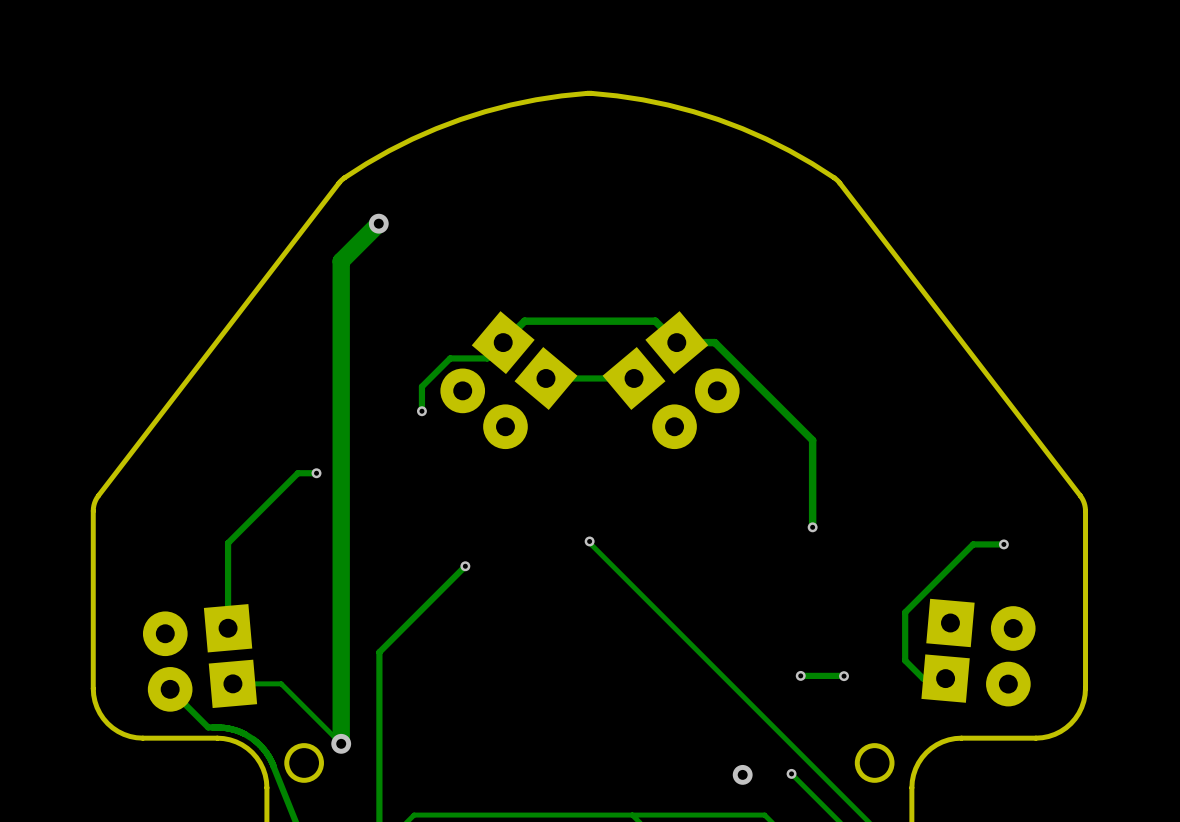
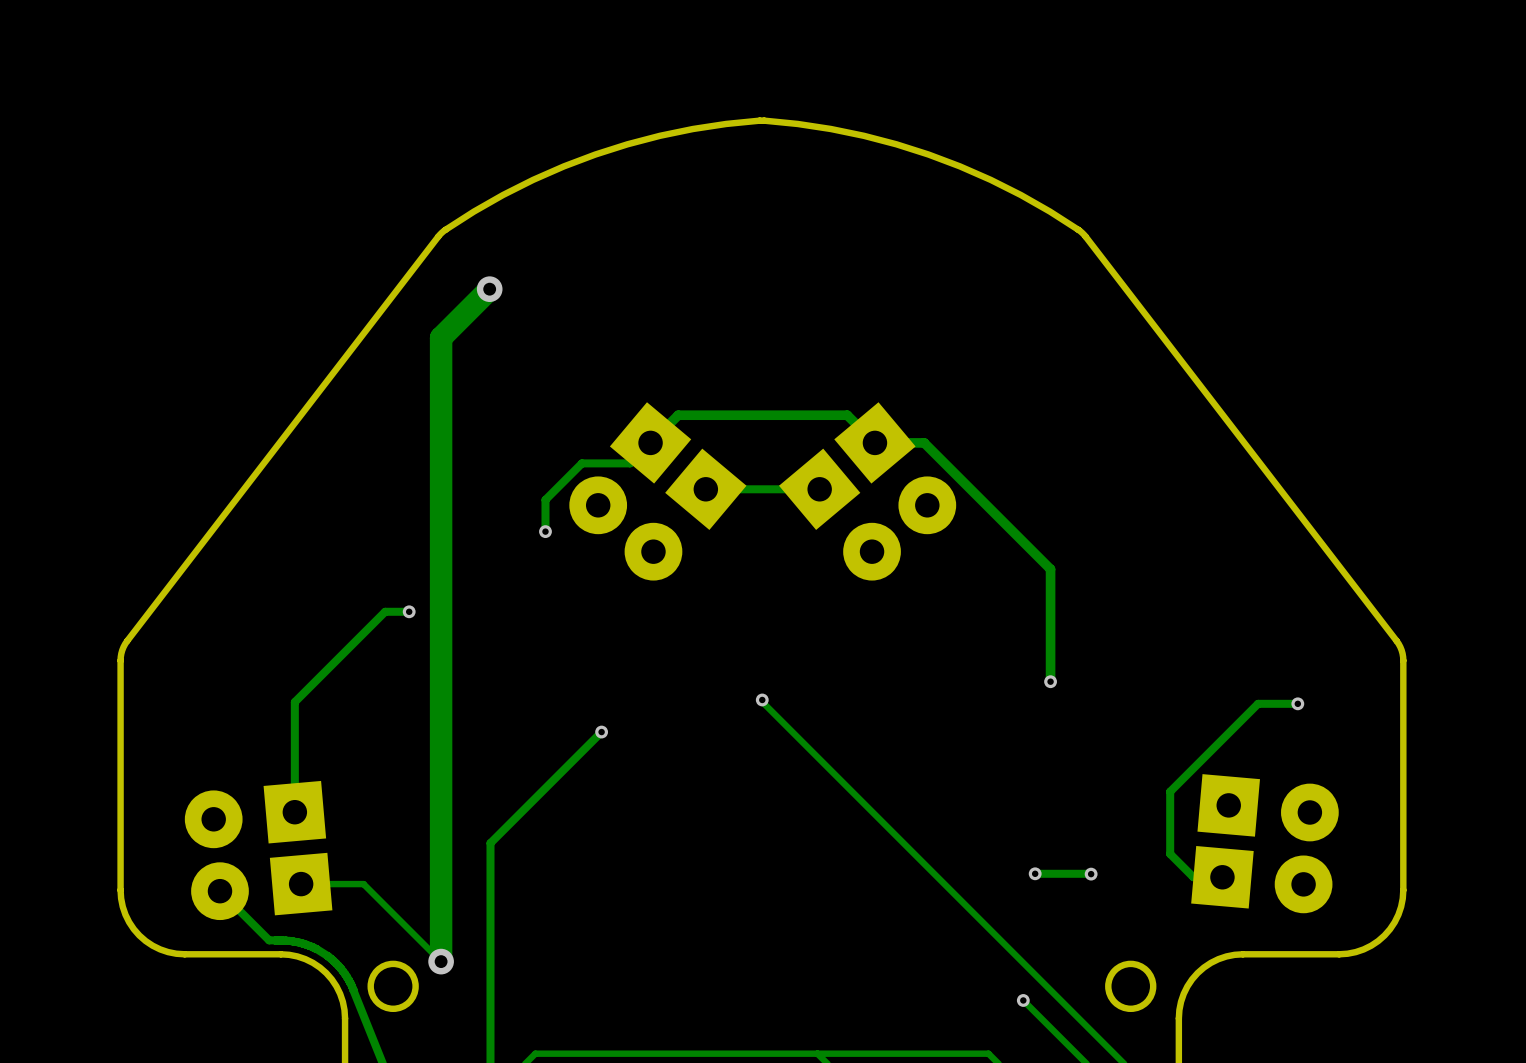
via: (742, 774) -> none

